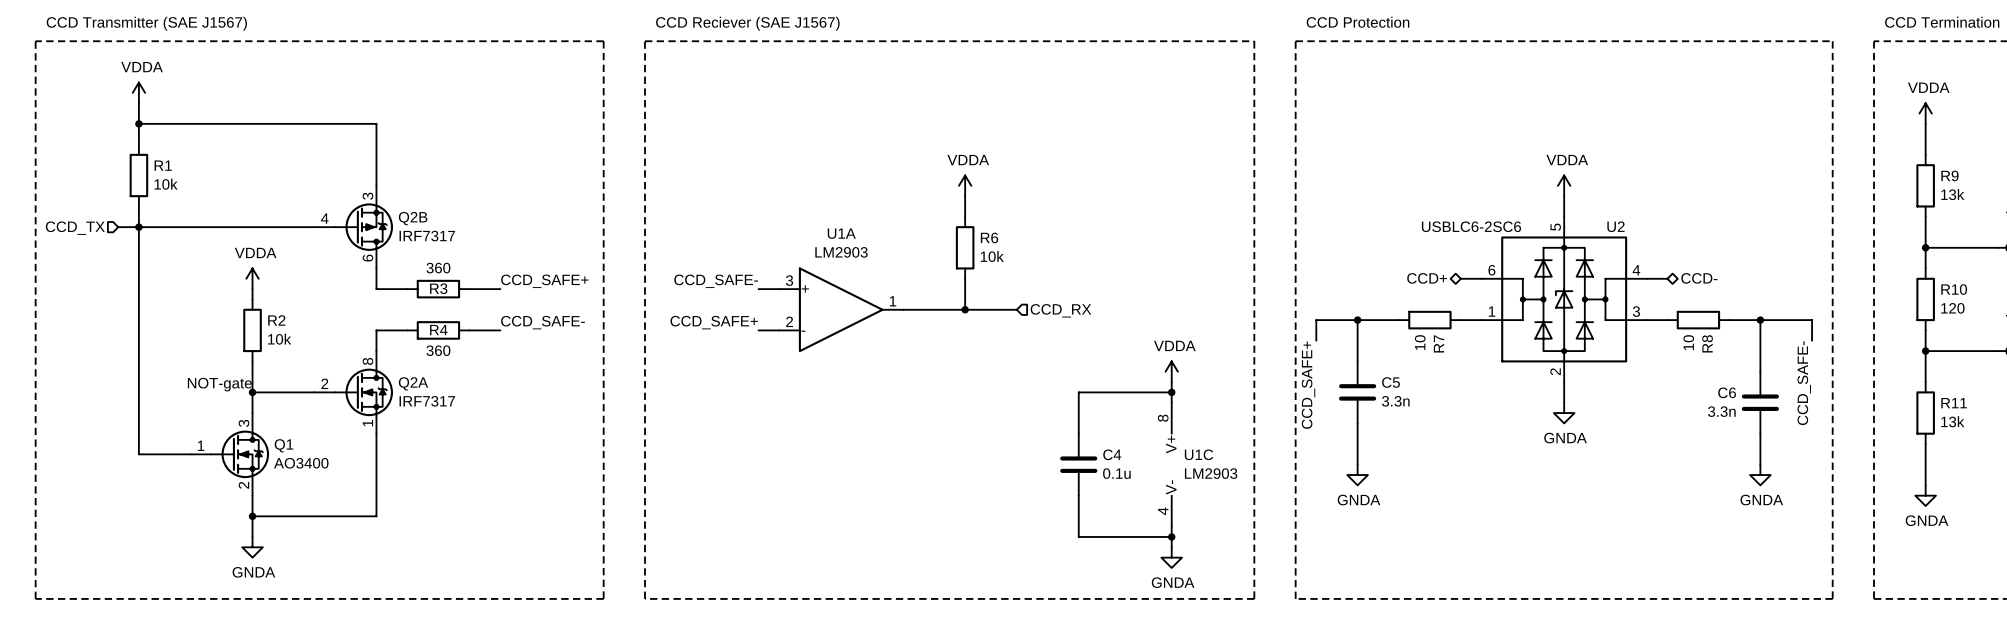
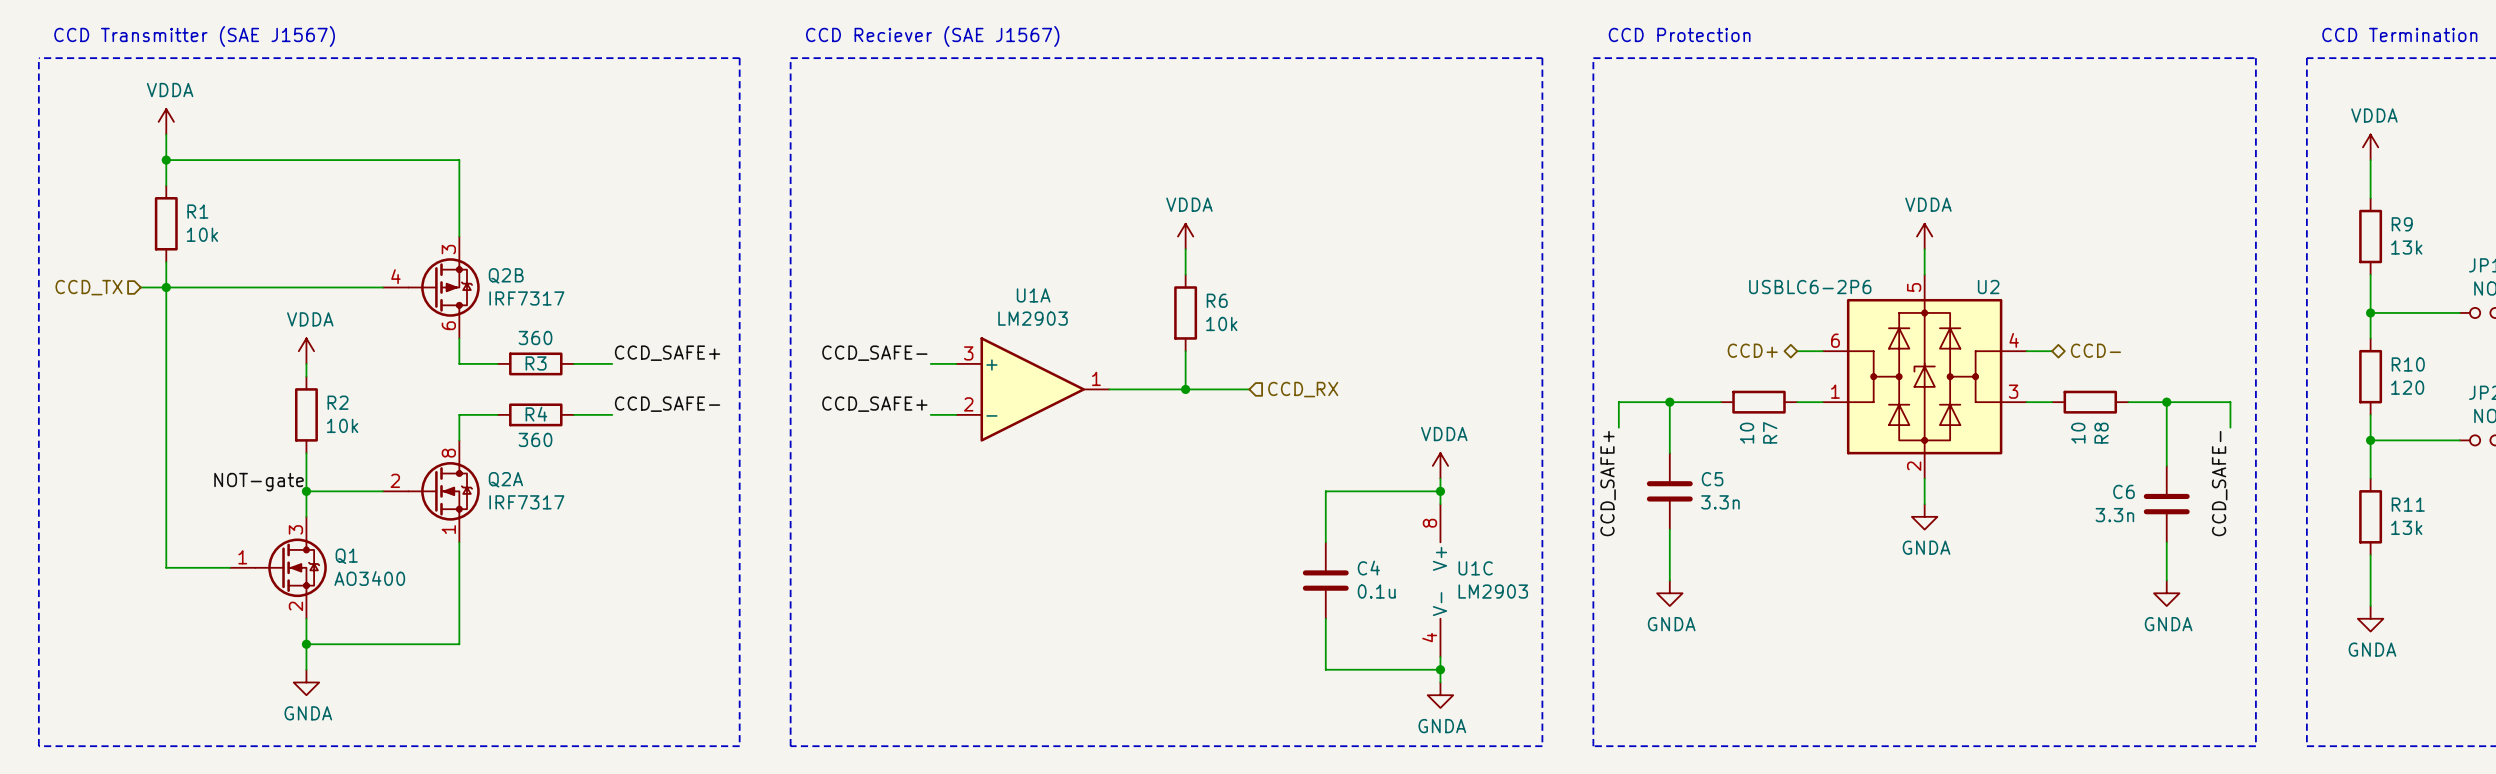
U2 value: USBLC6-2SC6 (1471, 226) -> USBLC6-2P6 (1810, 287)

